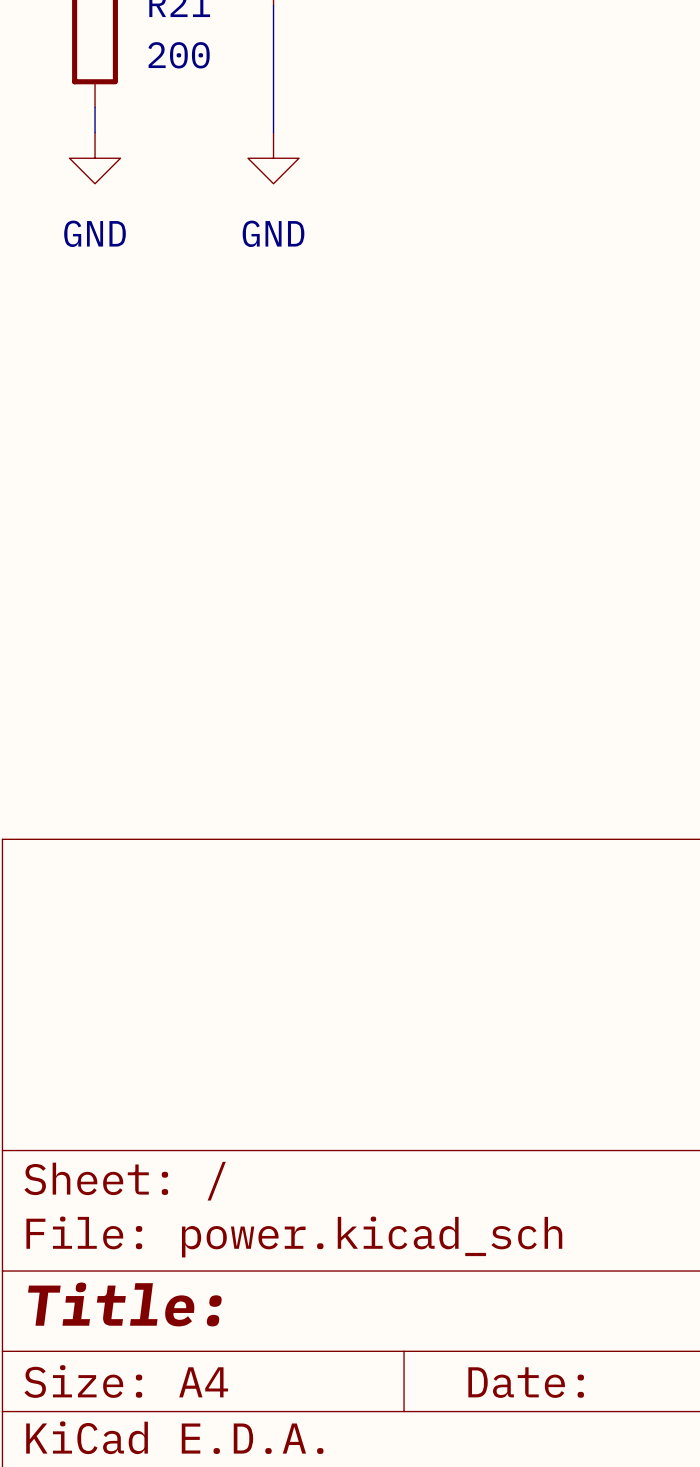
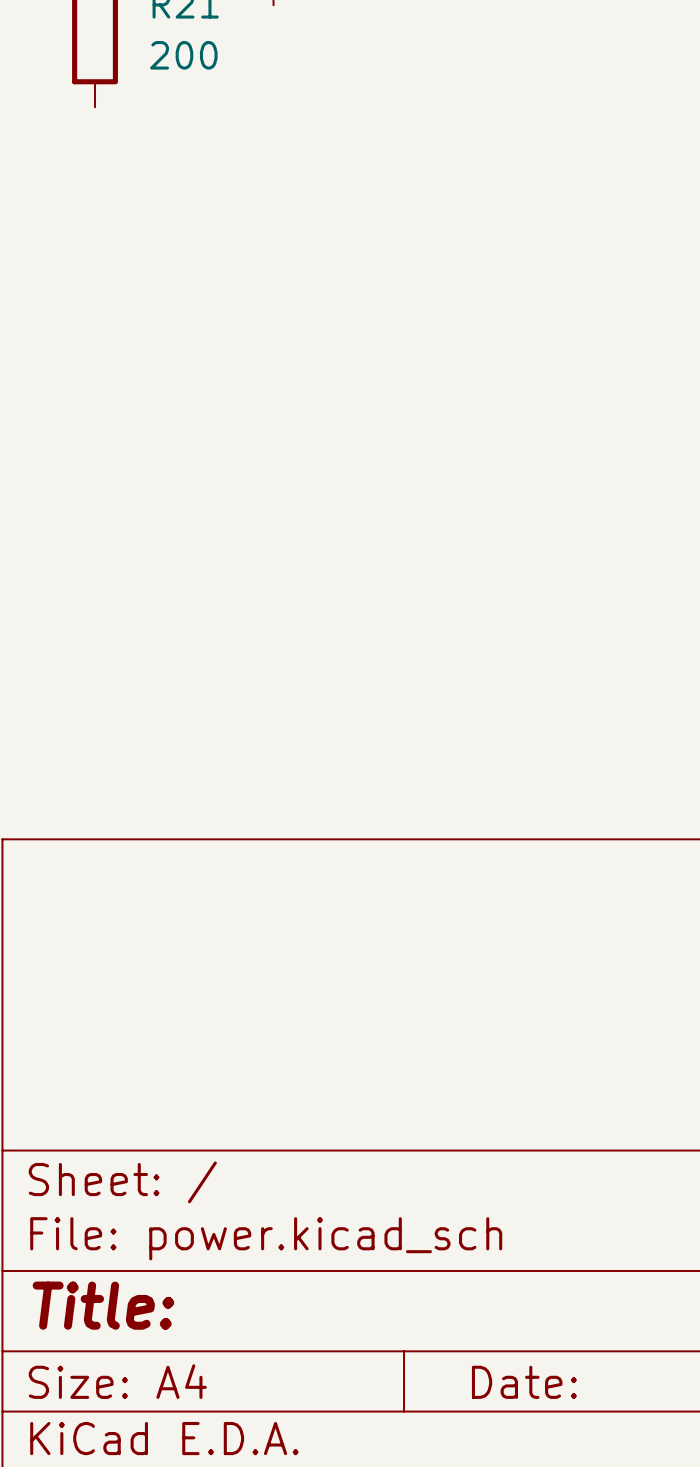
wire: (273, 5) (273, 132) -> none
wire: (95, 107) (95, 132) -> none
power symbol: GND (95, 158) -> none
power symbol: GND (273, 158) -> none

